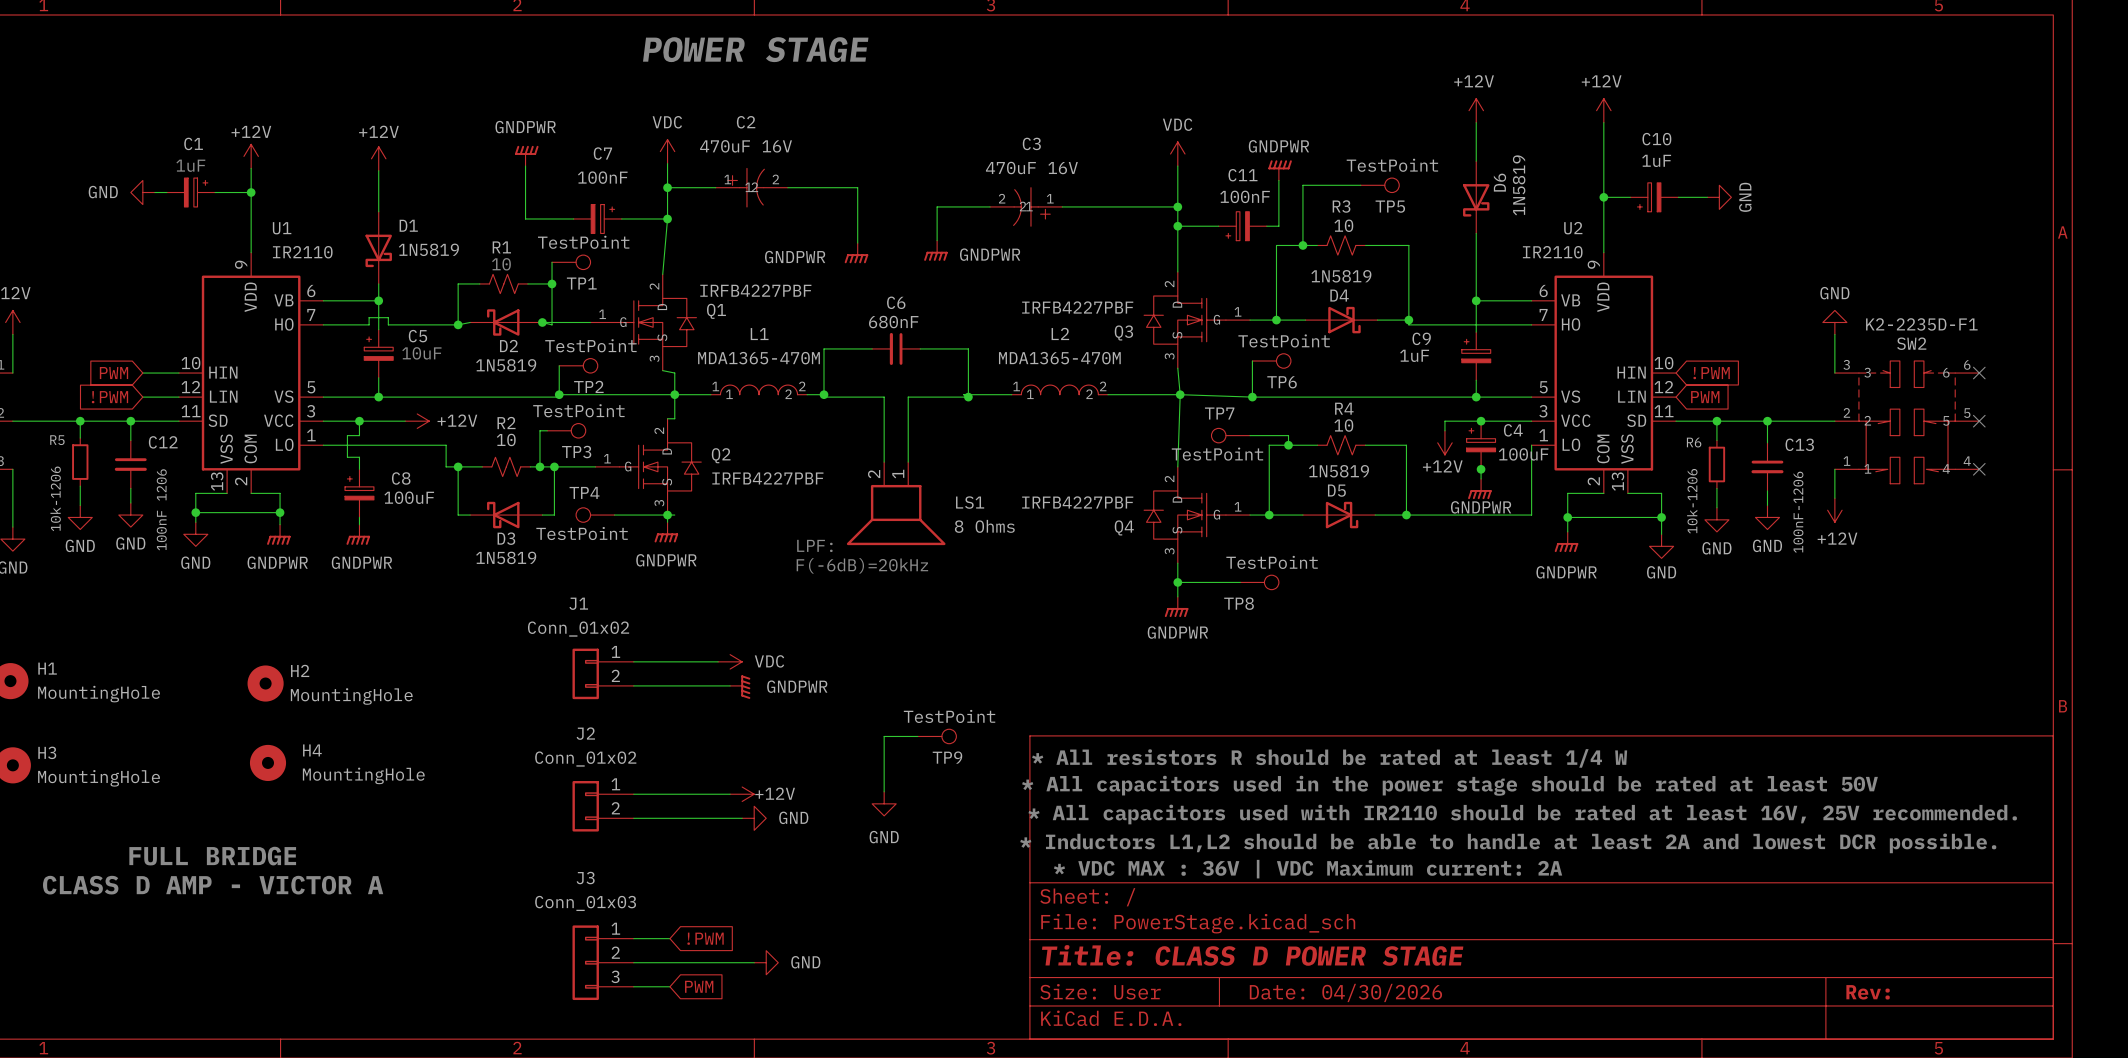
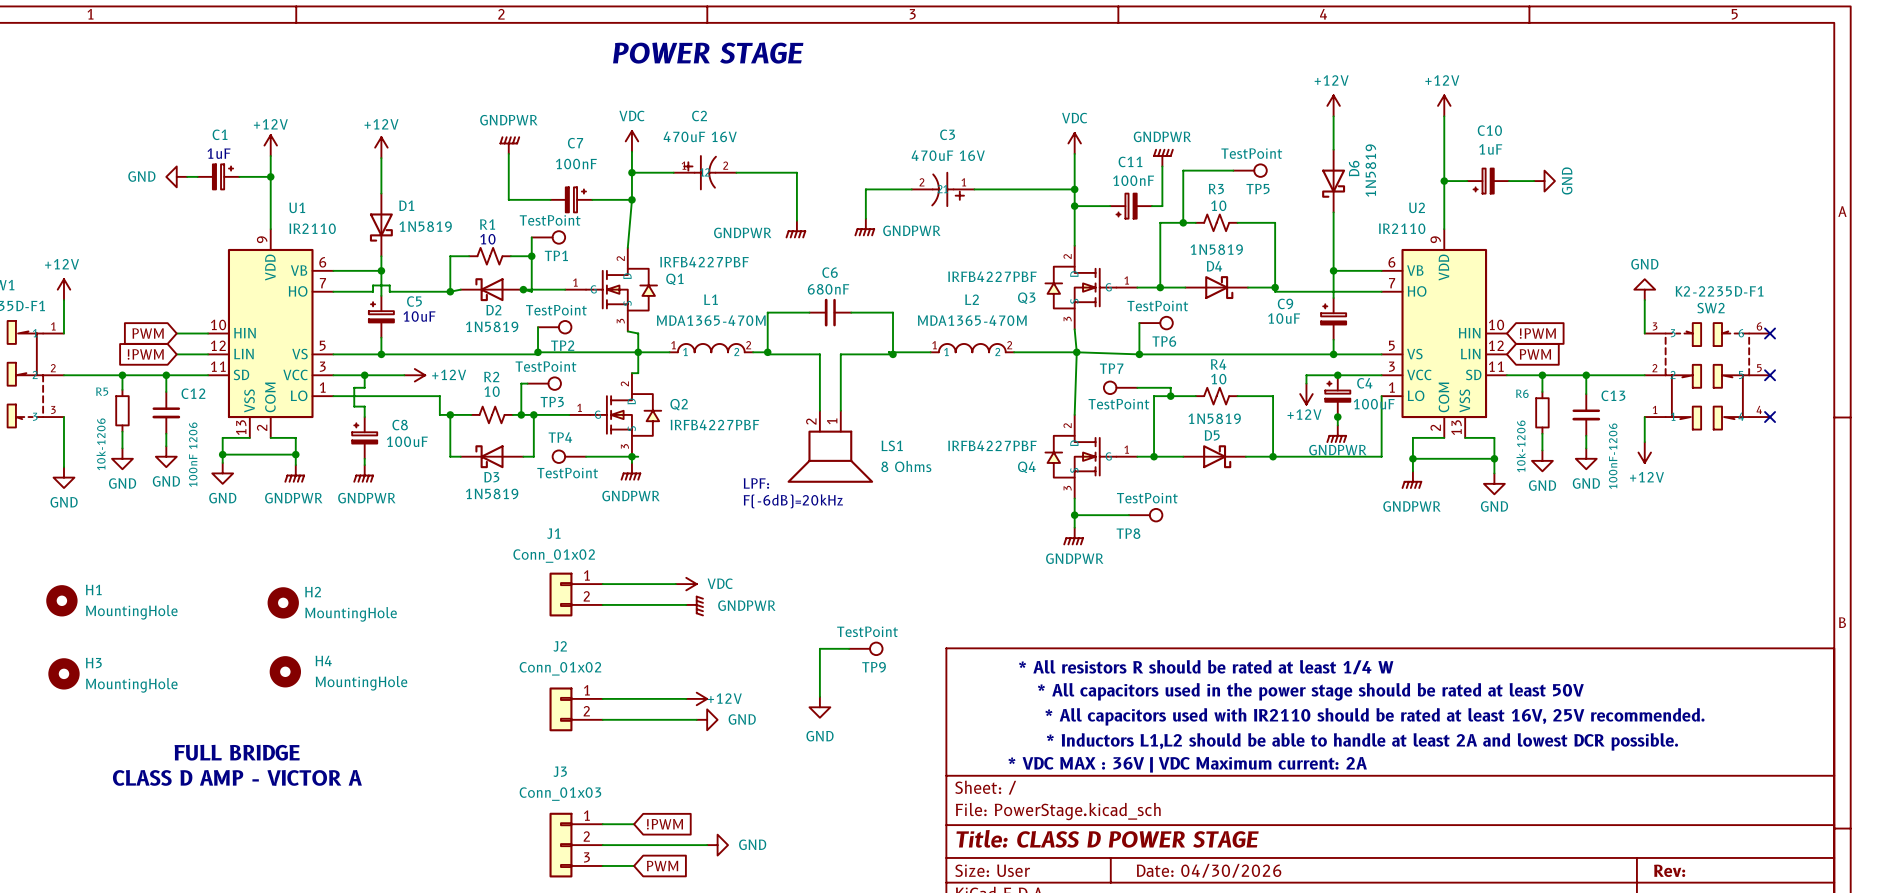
C9 value: 1uF (1414, 355) -> 10uF (1284, 318)

